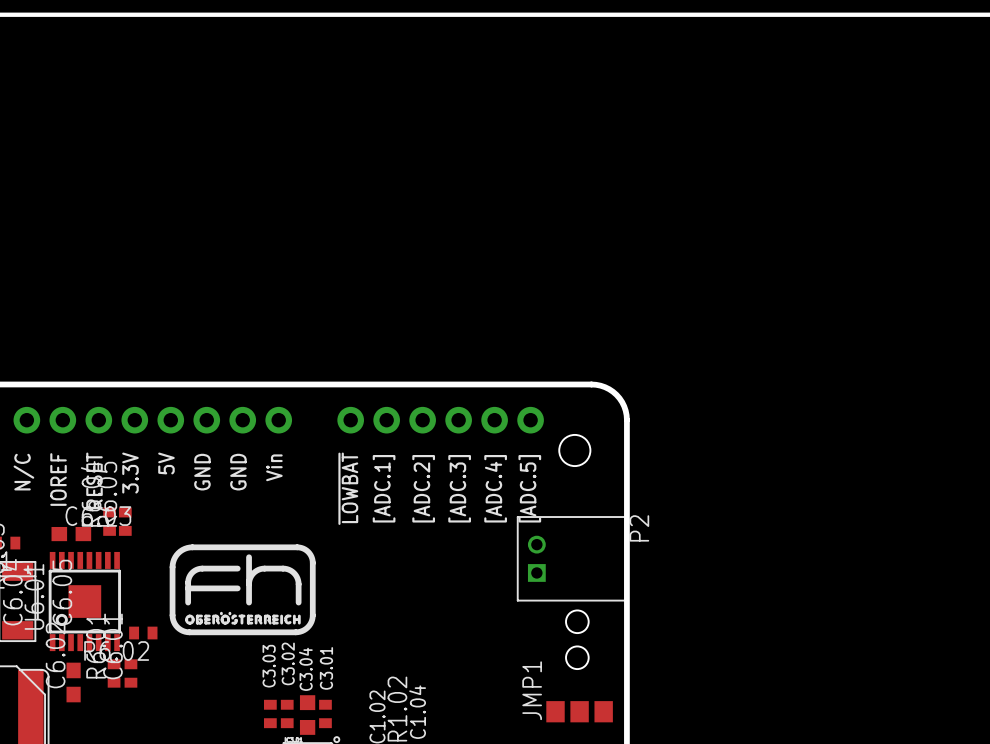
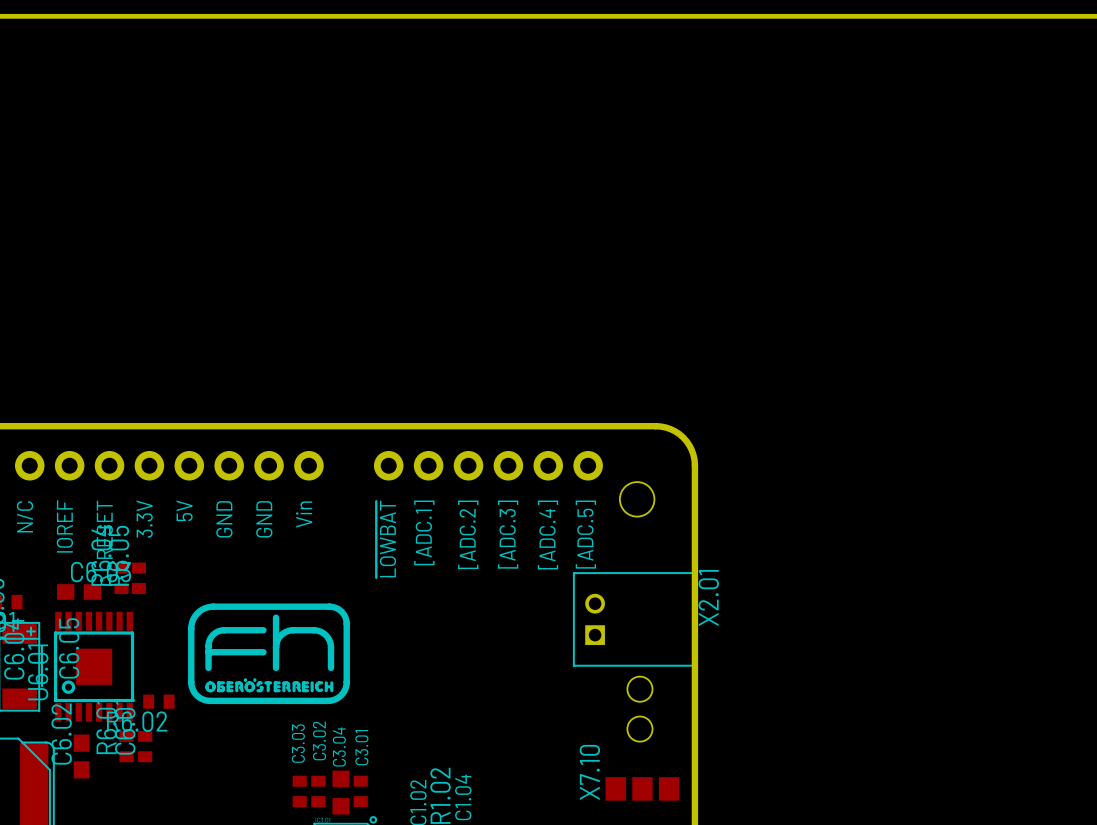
P2 name: P2 (639, 528) -> X2.01 (708, 598)
JMP1 name: JMP1 (532, 690) -> X7.10 (589, 772)

